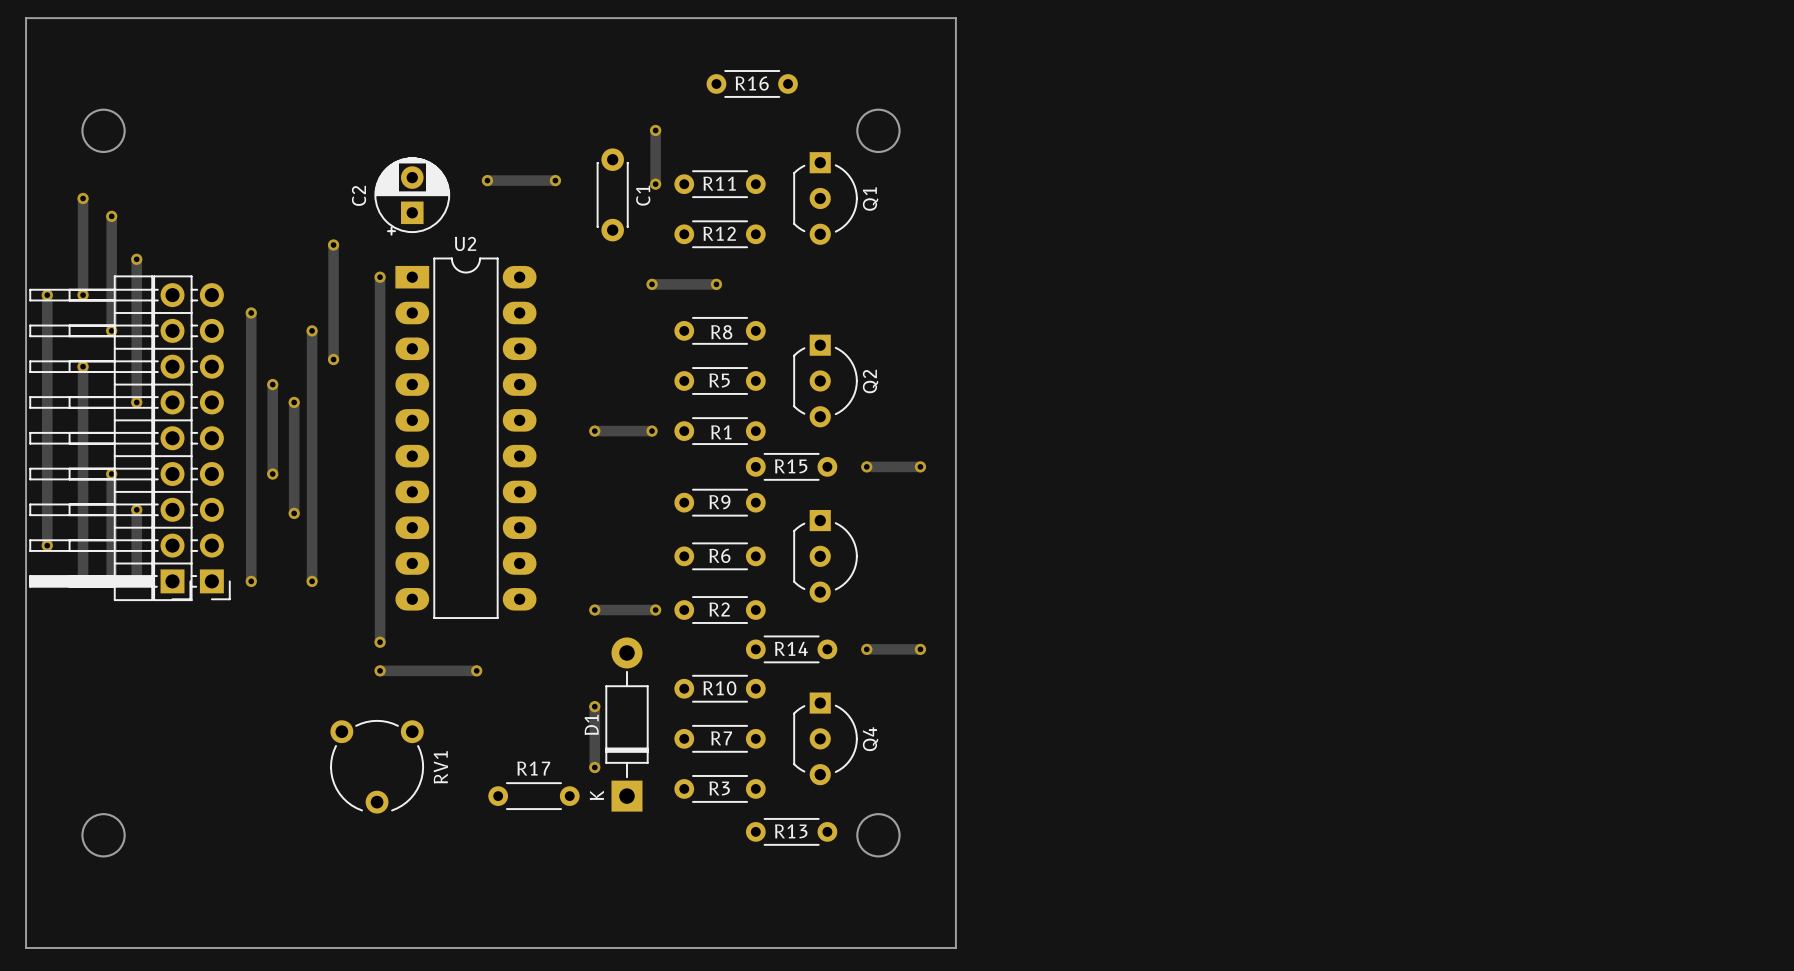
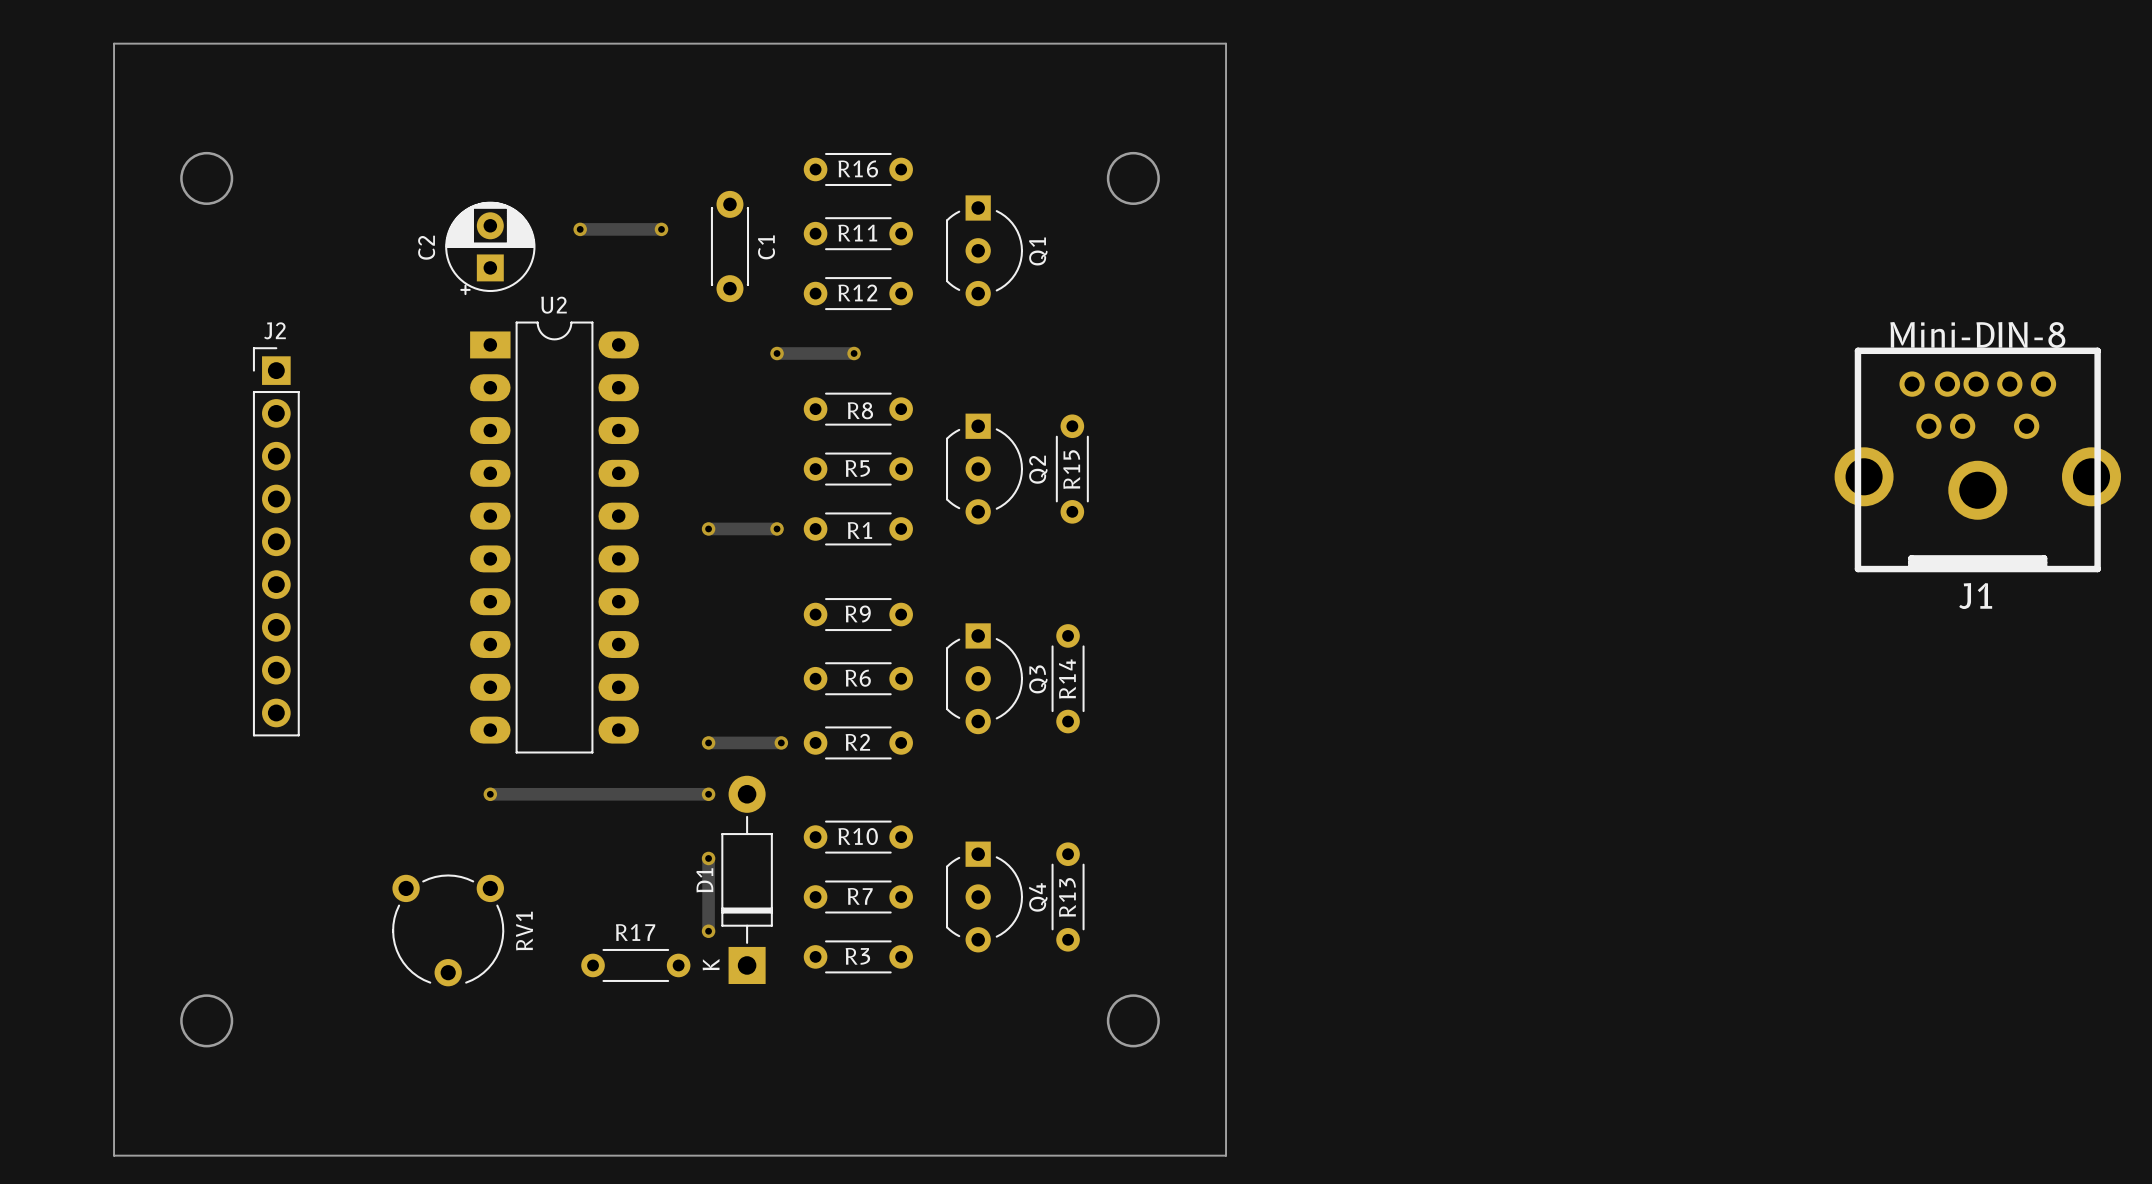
board edge: (26, 18) (955, 18) (955, 947) (26, 947) (26, 18) -> (114, 43) (1226, 43) (1226, 1155) (114, 1155) (114, 43)
R16 position: (752, 83) -> (858, 169)
round board edge position: (103, 130) -> (206, 178)
track: (655, 130) (655, 184) -> none
via: (655, 130) -> none
round board edge position: (878, 130) -> (1133, 178)
via: (655, 184) -> none
track: (83, 198) (83, 295) -> none
via: (83, 198) -> none
track: (111, 216) (111, 330) -> none
via: (111, 216) -> none
track: (333, 245) (333, 359) -> none
via: (333, 245) -> none
track: (136, 259) (136, 402) -> none
via: (136, 259) -> none
track: (380, 277) (380, 642) -> none
via: (380, 277) -> none
track: (47, 295) (47, 545) -> none
via: (47, 295) -> none
via: (83, 295) -> none
track: (251, 313) (251, 581) -> none
via: (251, 313) -> none
via: (111, 330) -> none
track: (312, 330) (312, 581) -> none
via: (312, 330) -> none
via: (333, 359) -> none
track: (83, 366) (83, 581) -> none
via: (83, 366) -> none
J1: none -> Mini-DIN-8 (1977, 459)
track: (272, 384) (272, 474) -> none
via: (272, 384) -> none
via: (136, 402) -> none
track: (294, 402) (294, 513) -> none
via: (294, 402) -> none
part: (110, 438) -> none
part: (149, 438) -> none
J2: none -> (276, 541)
R15 rotation: 0° (791, 466) -> 90° clockwise (1072, 469)
R15 position: (791, 466) -> (1072, 469)
track: (866, 466) (920, 466) -> none
via: (866, 466) -> none
via: (920, 466) -> none
track: (111, 474) (111, 581) -> none
via: (111, 474) -> none
via: (272, 474) -> none
track: (136, 509) (136, 581) -> none
via: (136, 509) -> none
via: (294, 513) -> none
via: (47, 545) -> none
Q3 name: none -> Q3 (1038, 679)
via: (251, 581) -> none
via: (312, 581) -> none
via: (380, 642) -> none
R14 rotation: 0° (791, 649) -> 90° clockwise (1068, 678)
R14 position: (791, 649) -> (1068, 678)
track: (866, 649) (920, 649) -> none
via: (866, 649) -> none
via: (920, 649) -> none
track: none -> (490, 794) (708, 794)
via: none -> (490, 794)
via: none -> (708, 794)
track: (380, 670) (476, 670) -> none
via: (380, 670) -> none
via: (476, 670) -> none
R13 rotation: 0° (791, 831) -> 90° clockwise (1068, 896)
R13 position: (791, 831) -> (1068, 896)
round board edge position: (103, 835) -> (206, 1020)
round board edge position: (878, 835) -> (1133, 1020)

